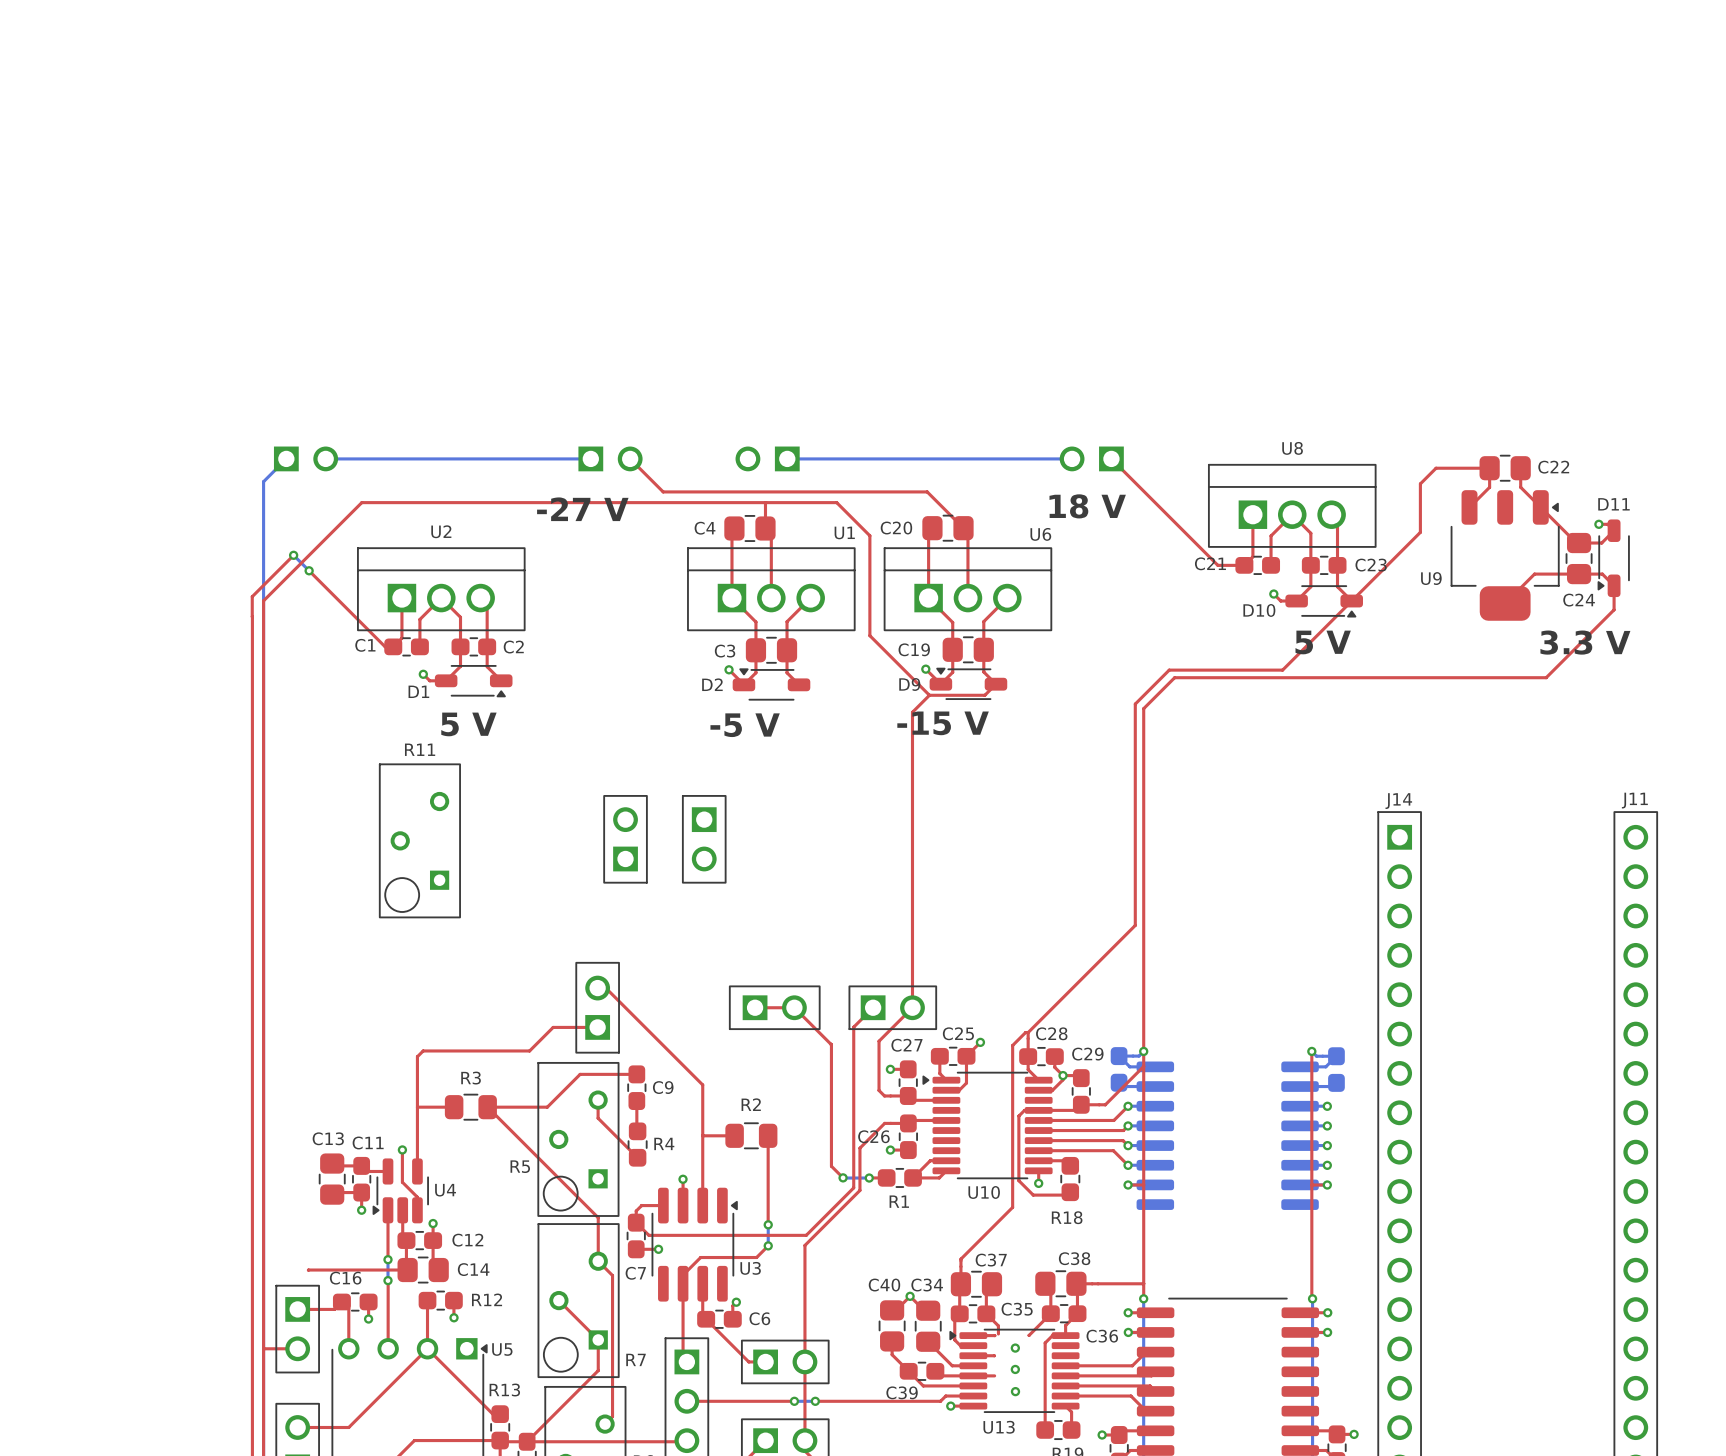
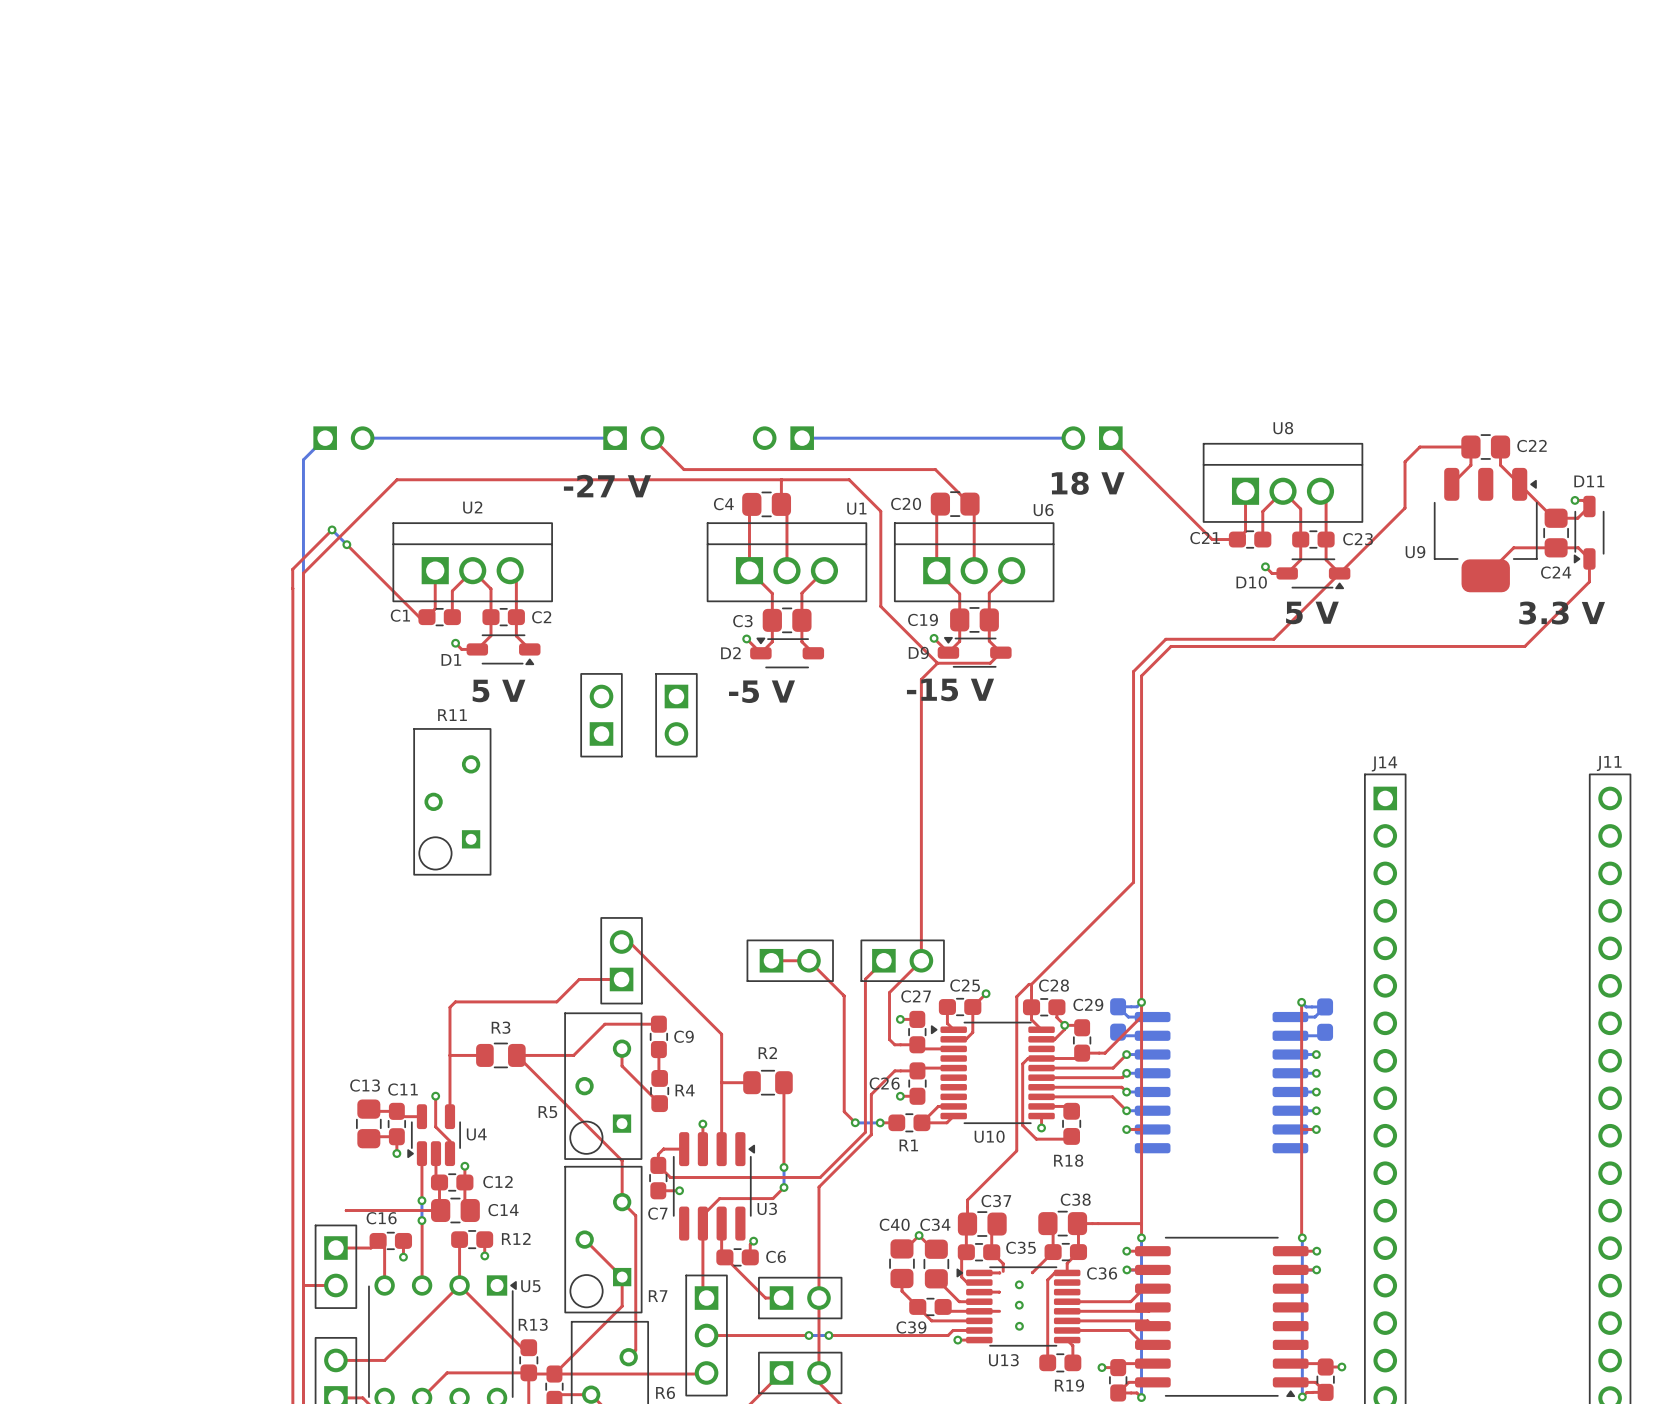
part: none -> (601, 715)
part: none -> (676, 715)
part: (625, 839) -> none
part: (704, 839) -> none

